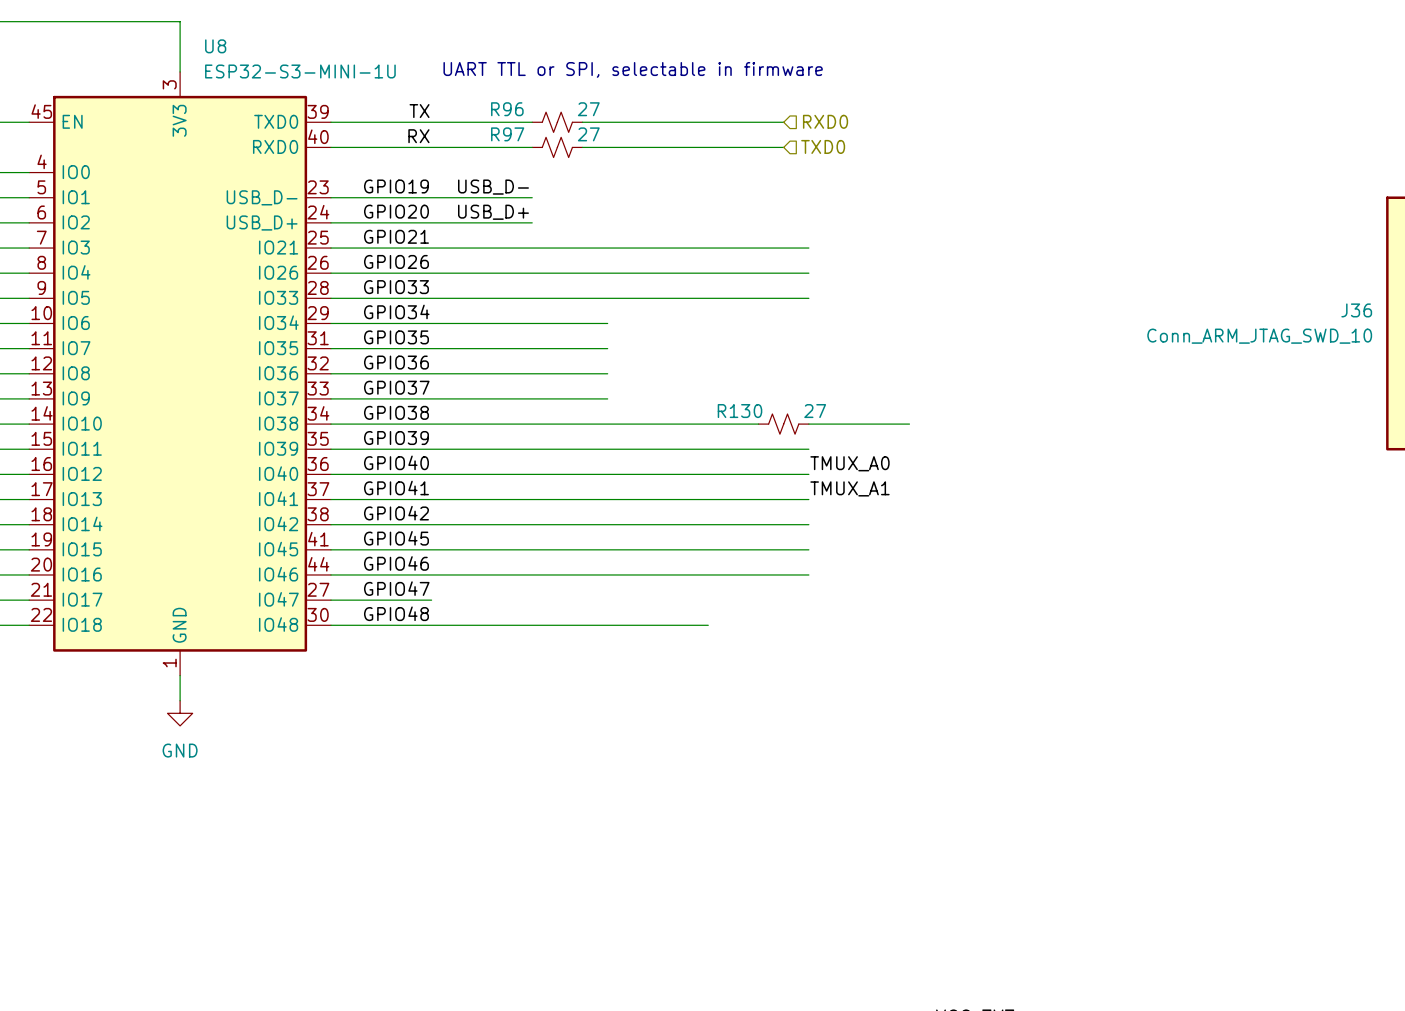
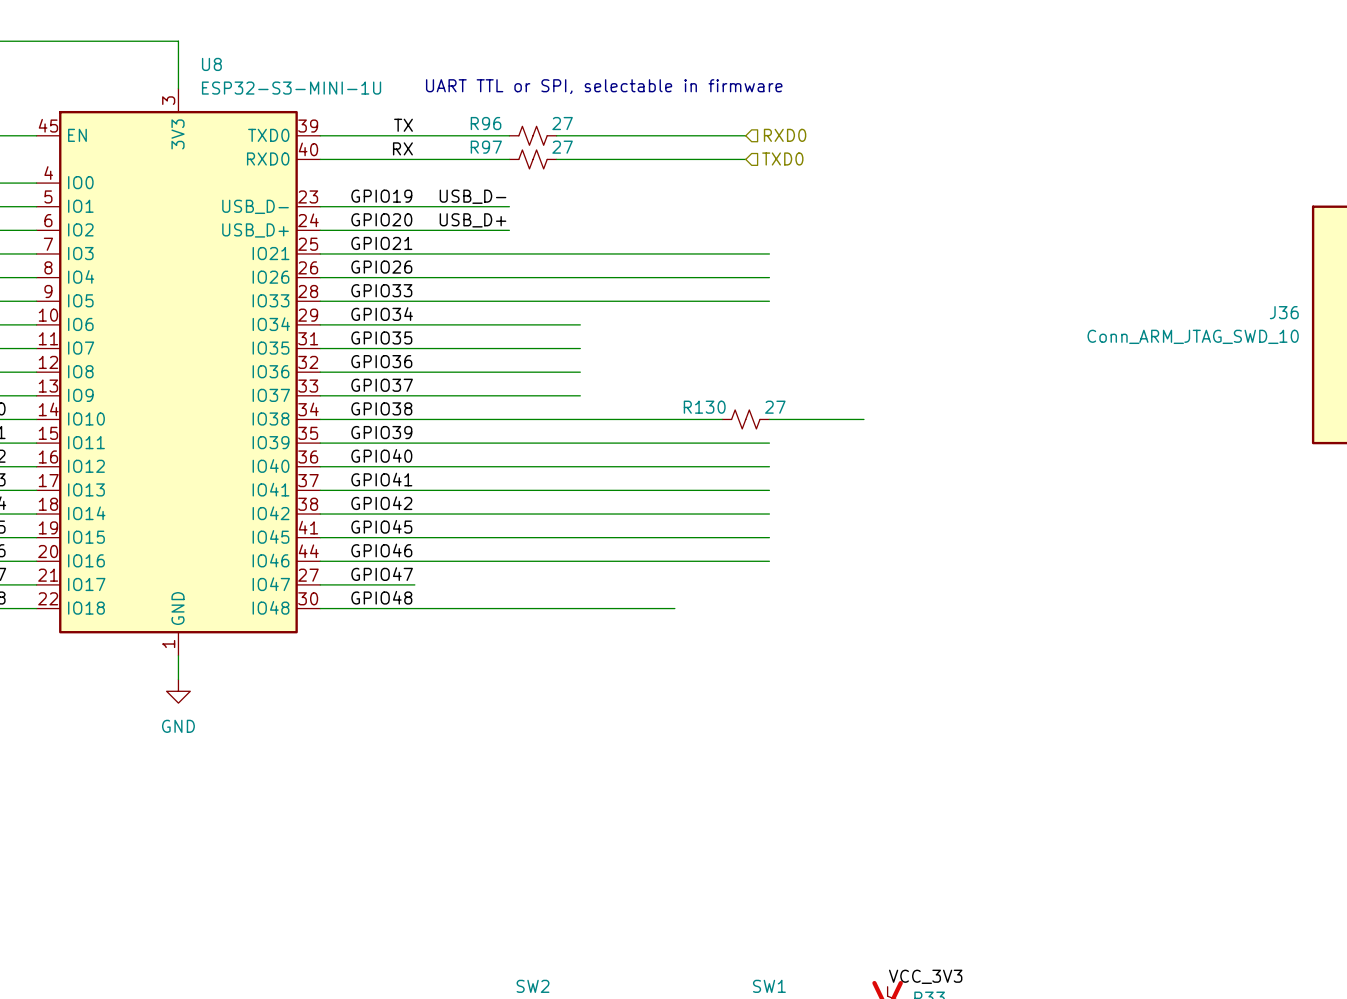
label: TMUX_A0 (849, 463) -> none
label: TMUX_A1 (849, 488) -> none

